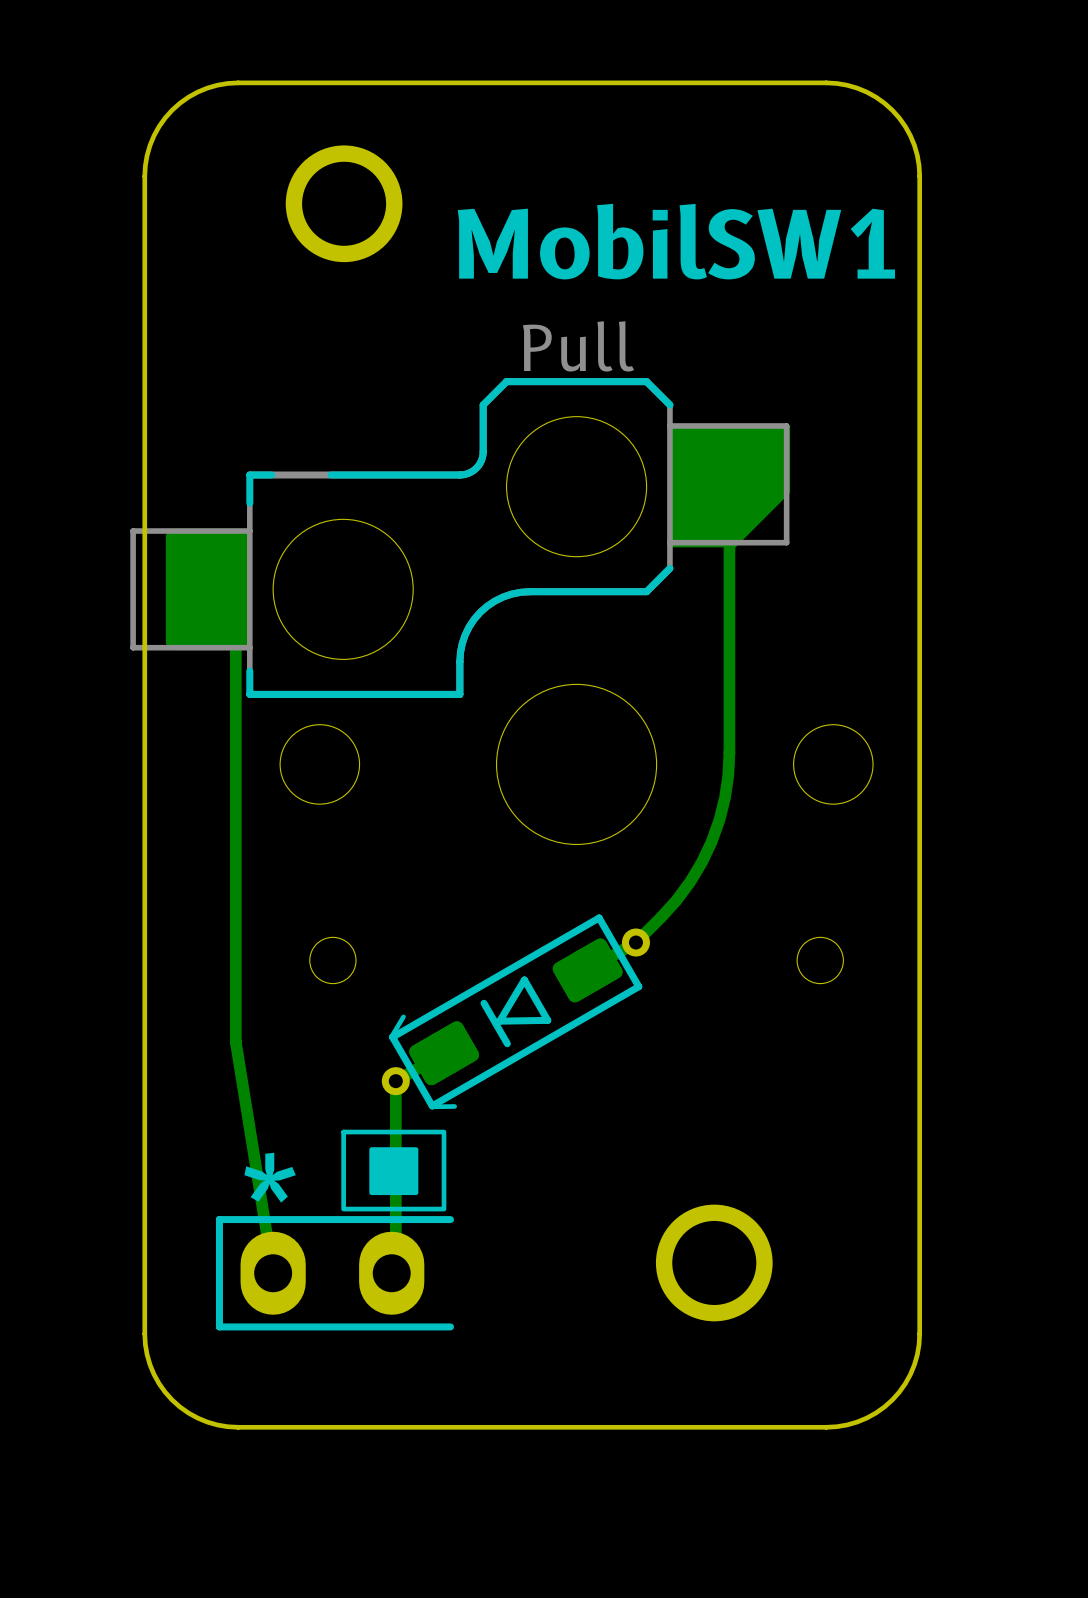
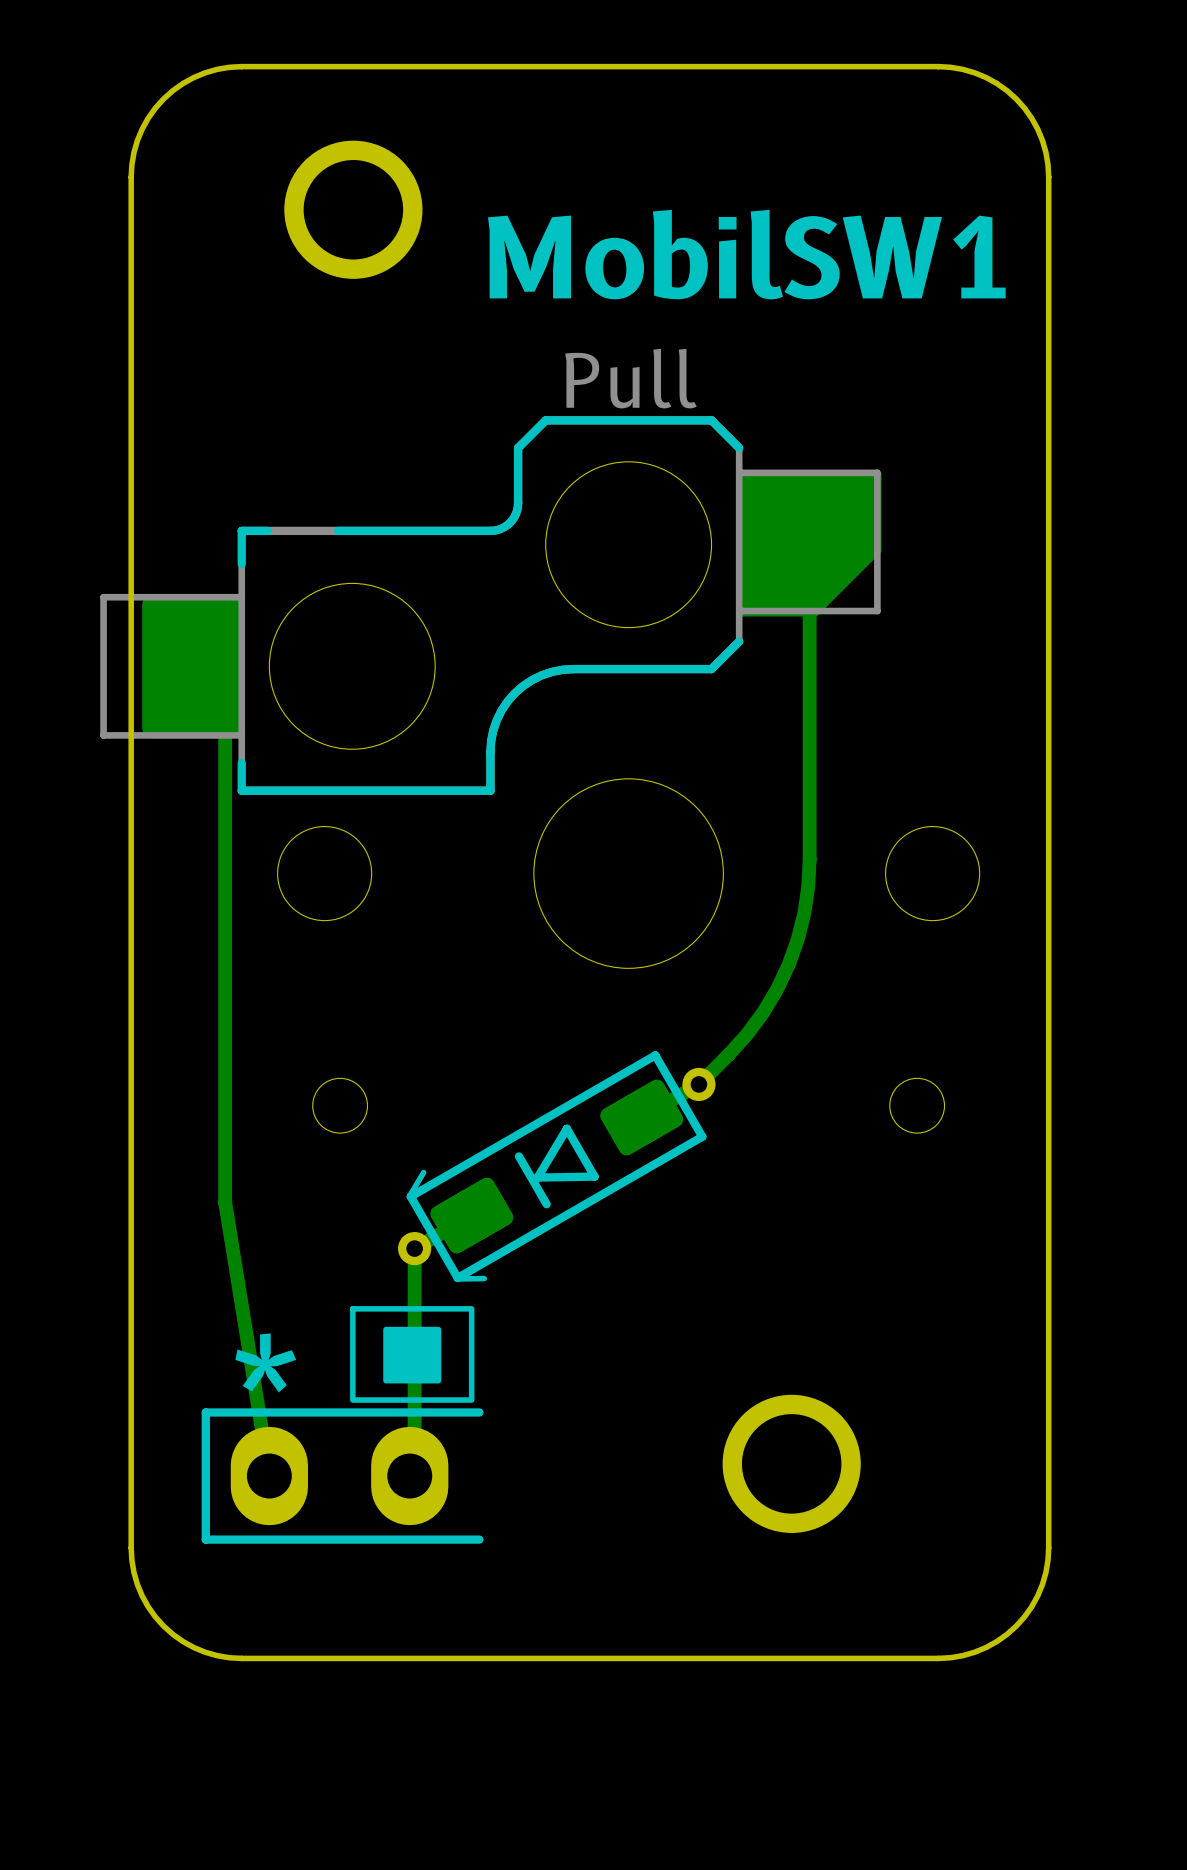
board edge: (249, 82) (227, 83) (207, 88) (179, 103) (165, 118) (154, 135) (147, 155) (144, 176) (145, 1344) (150, 1364) (159, 1383) (179, 1406) (207, 1422) (227, 1426) (249, 1427) -> (241, 66) (205, 72) (182, 83) (163, 98) (148, 118) (137, 140) (131, 177) (131, 1560) (142, 1595) (155, 1616) (172, 1634) (205, 1652) (241, 1658)
board edge: (826, 82) (847, 85) (866, 92) (892, 110) (905, 126) (914, 145) (919, 176) (919, 1344) (910, 1374) (899, 1392) (884, 1406) (857, 1422) (826, 1427) -> (924, 66) (950, 67) (974, 72) (1007, 90) (1024, 108) (1037, 129) (1045, 152) (1048, 177) (1048, 1560) (1037, 1595) (1024, 1616) (1007, 1634) (974, 1652) (950, 1657) (924, 1658)

